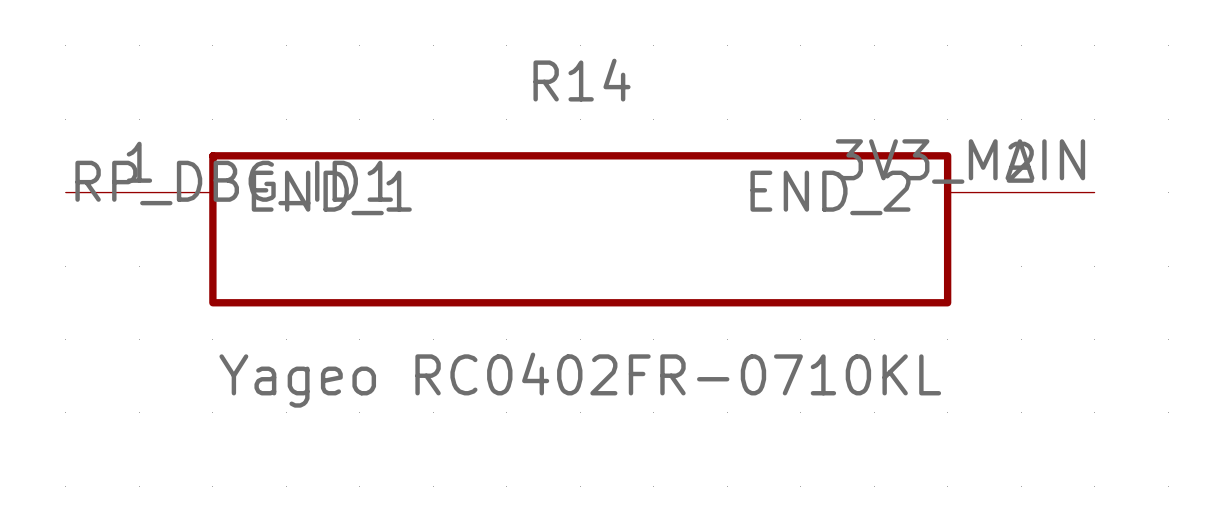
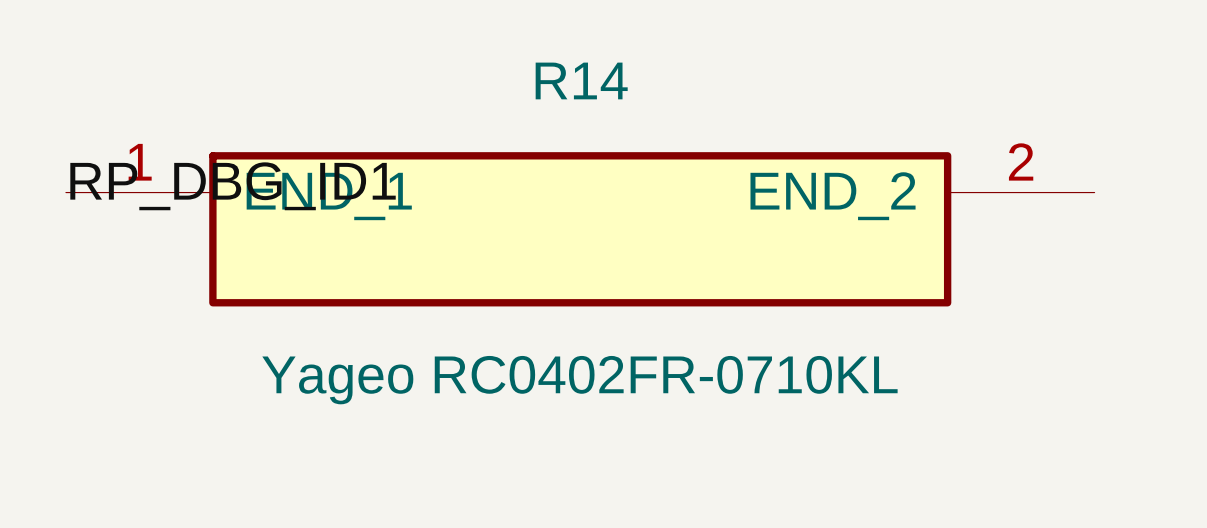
label: 3V3_MAIN (960, 161) -> none

